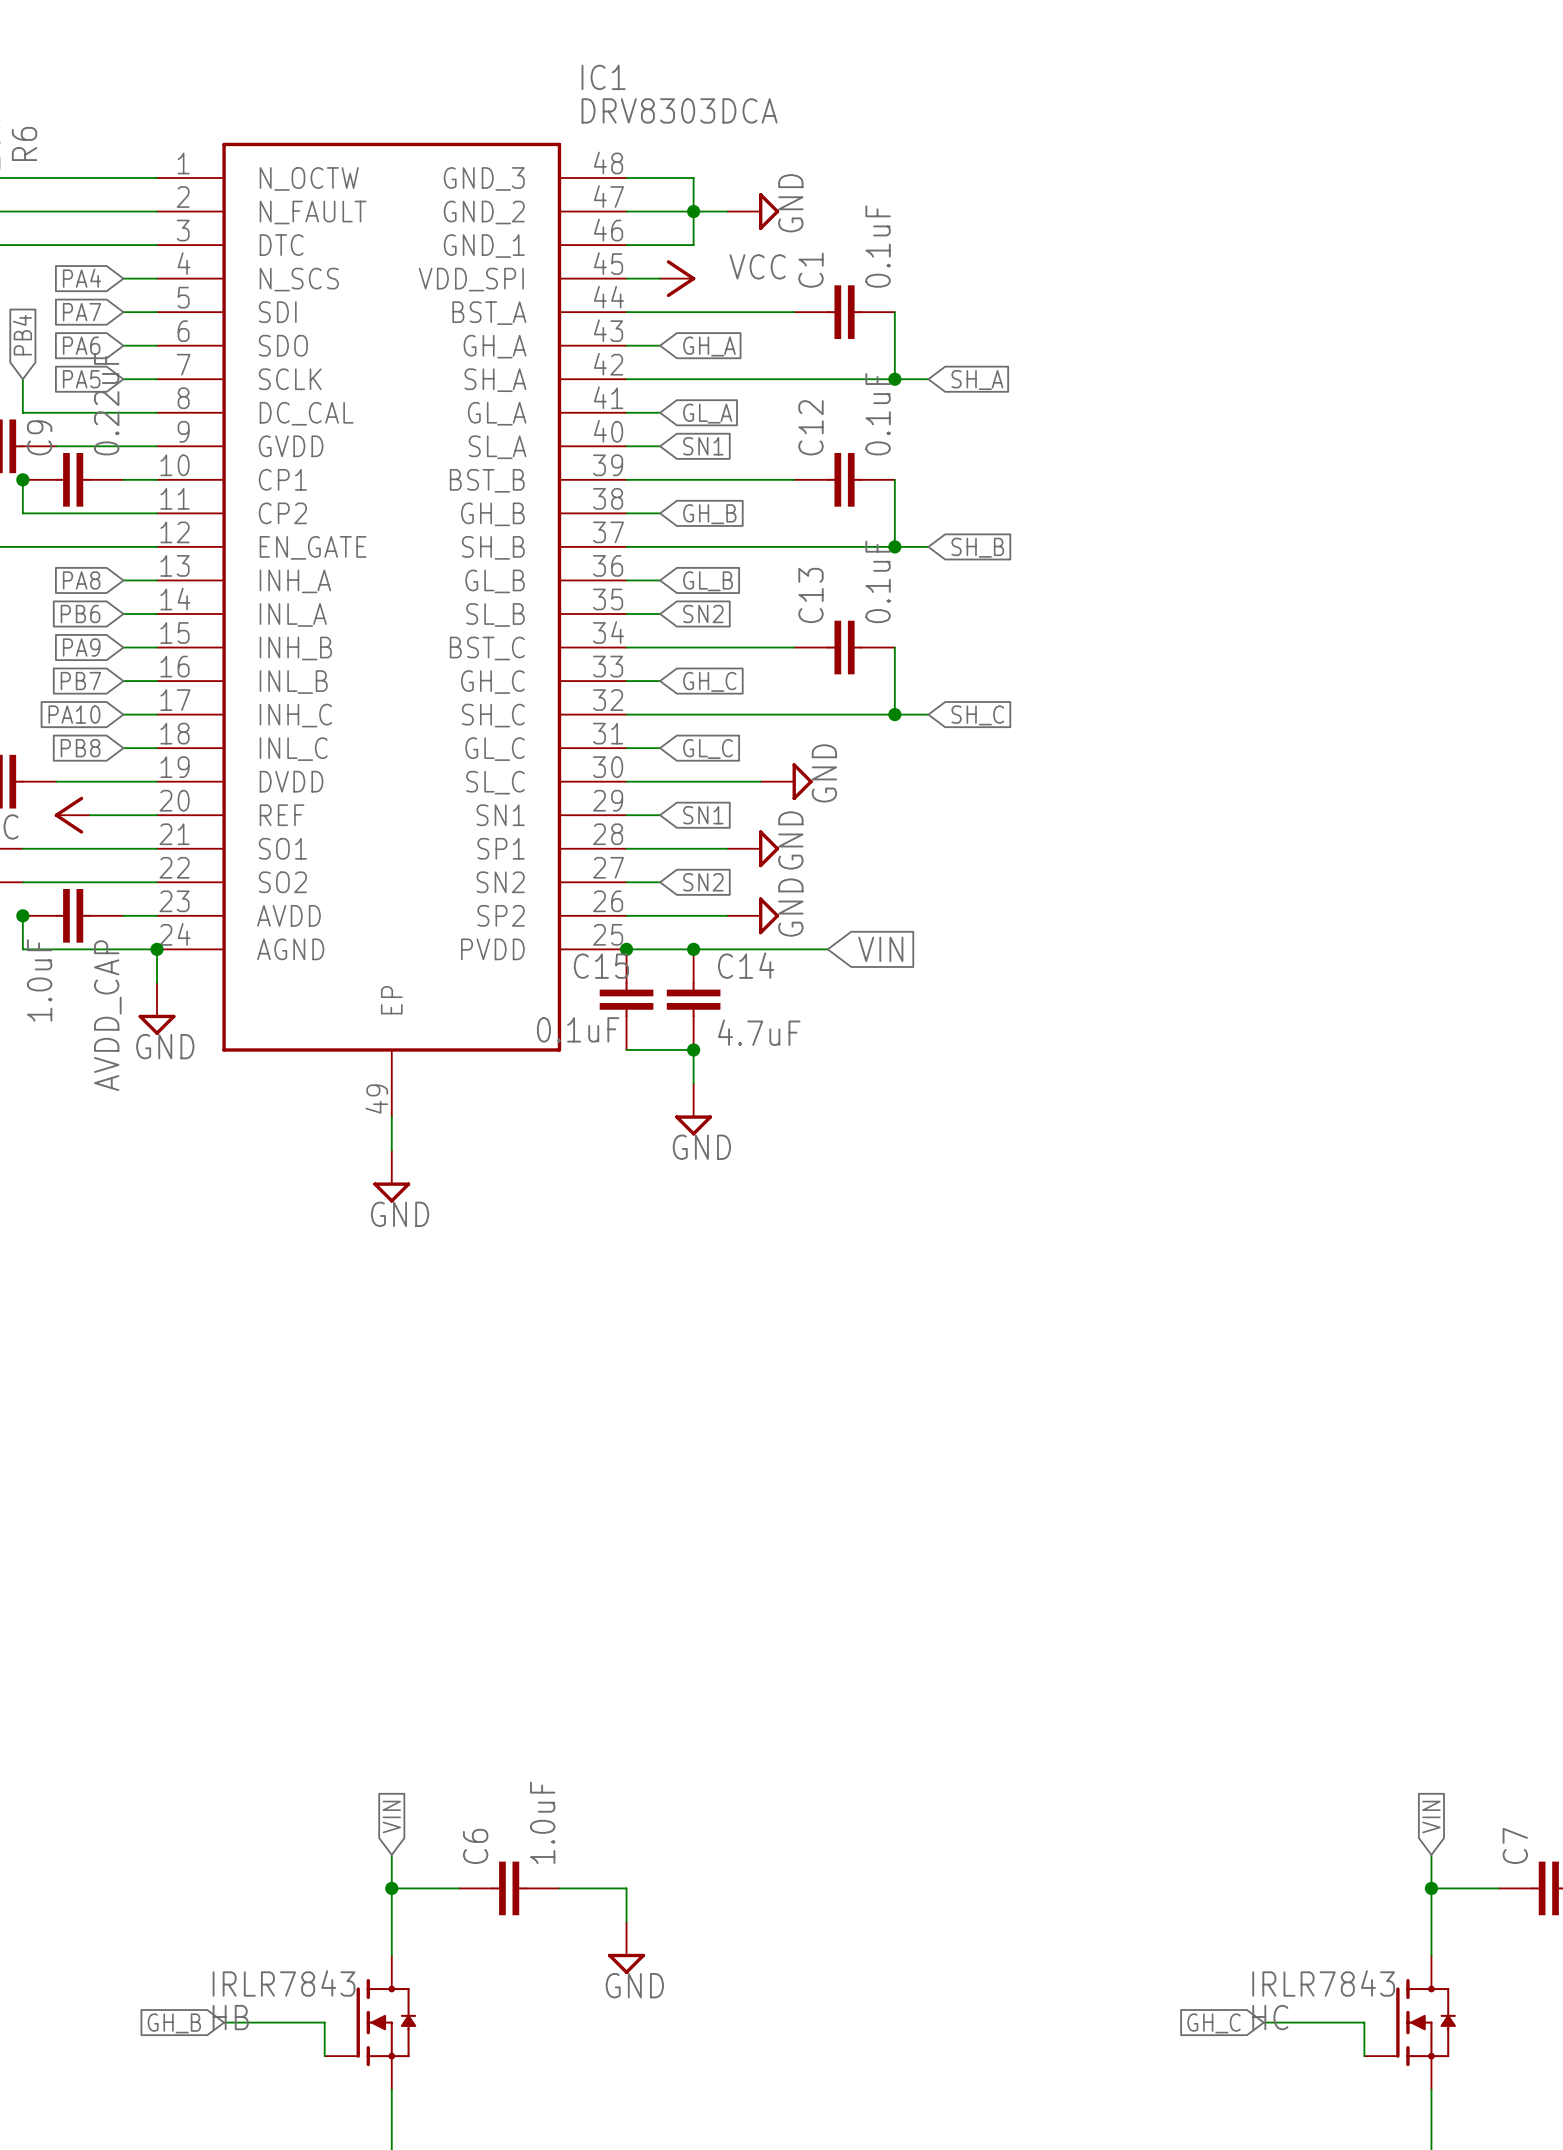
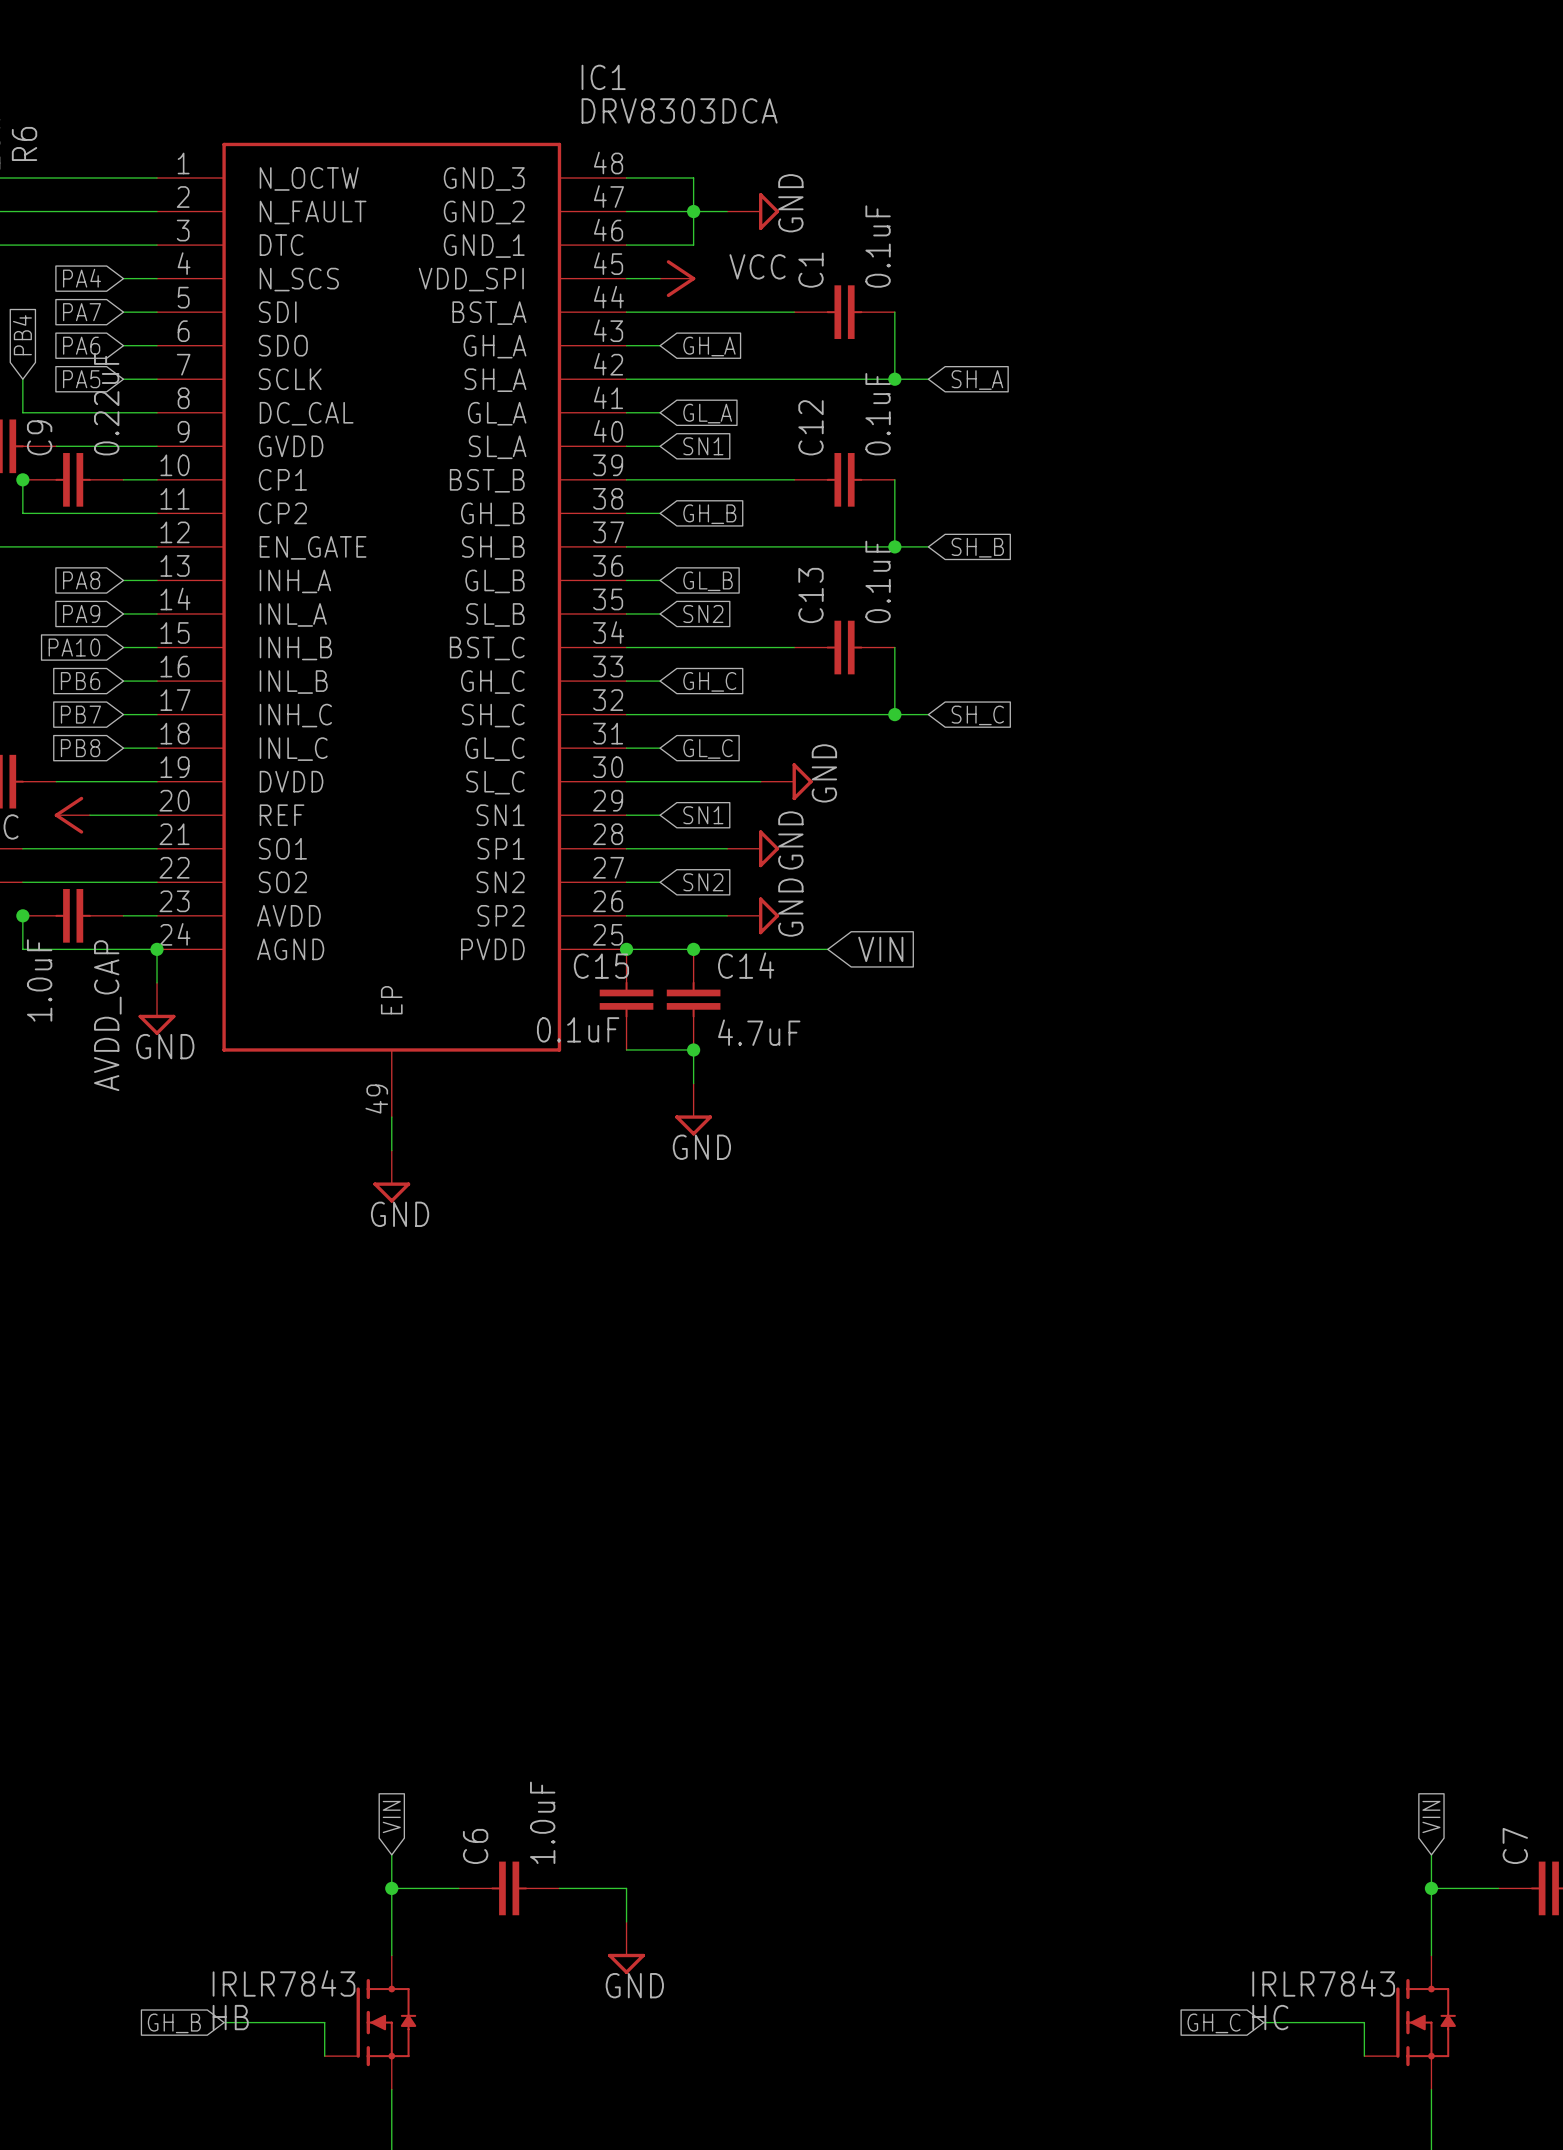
global label: PB6 (80, 613) -> PA9 (81, 613)
global label: PA9 (81, 647) -> PA10 (74, 647)
global label: PB7 (80, 681) -> PB6 (80, 681)
global label: PA10 (74, 714) -> PB7 (80, 714)

